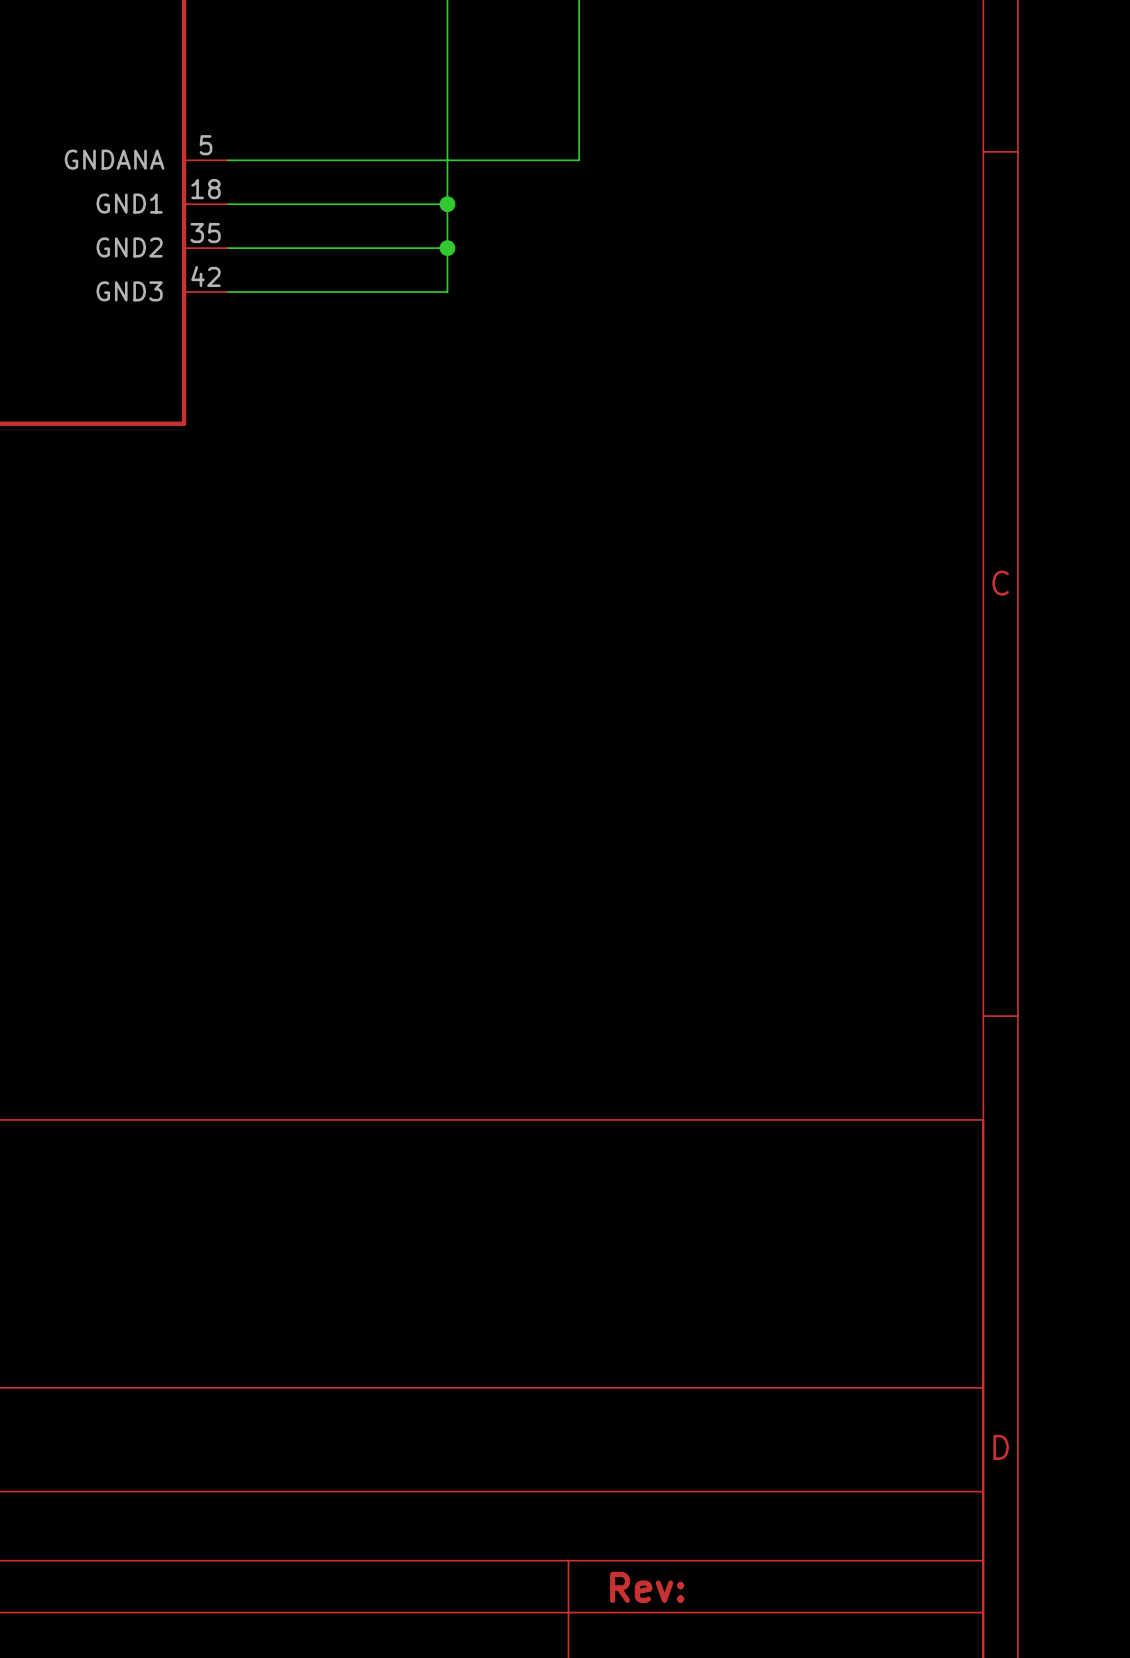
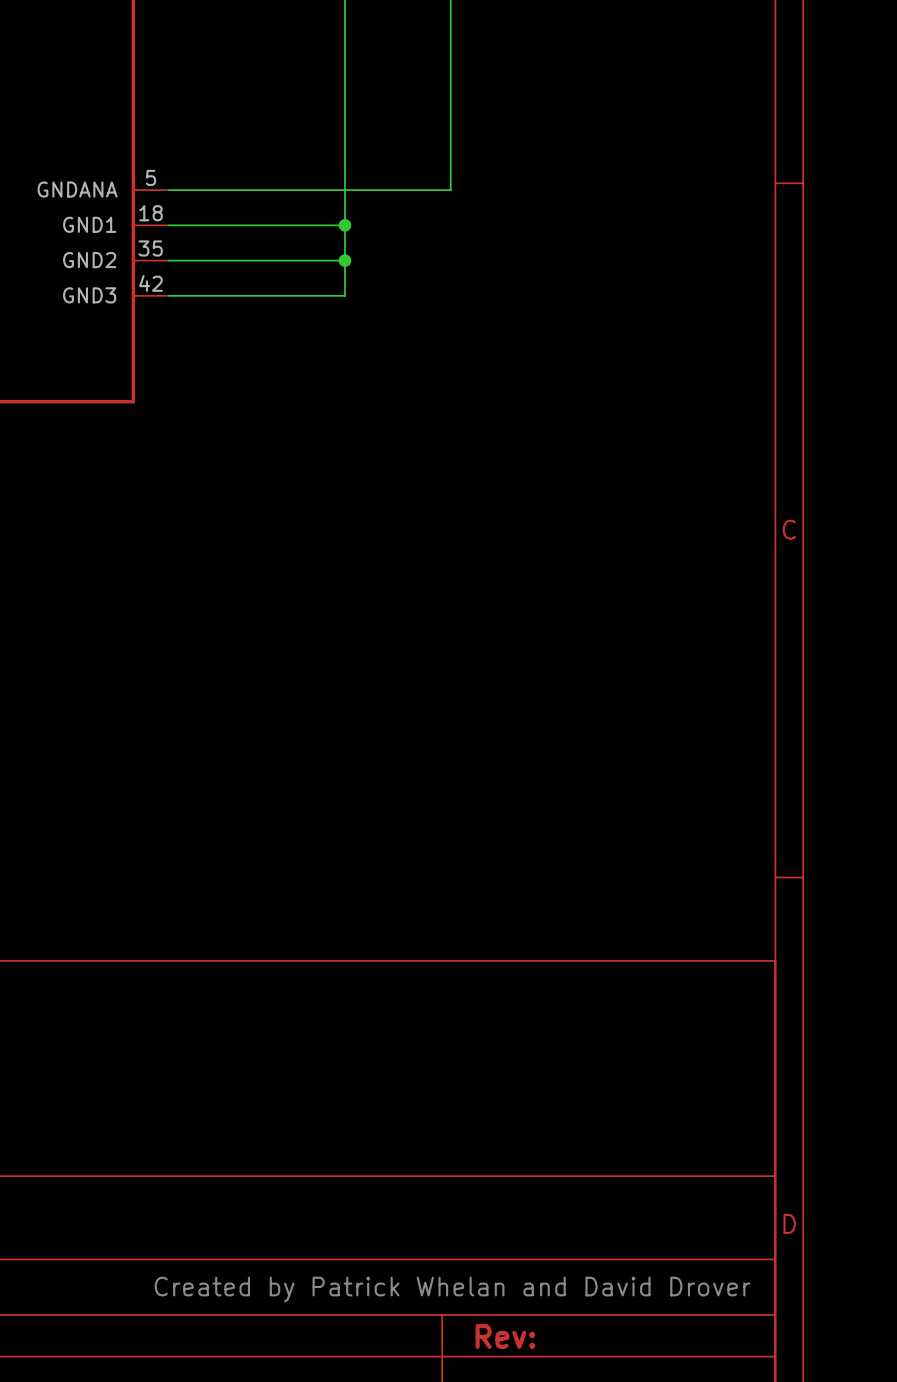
text: none -> Created by Patrick Whelan and David Drover (452, 1289)

